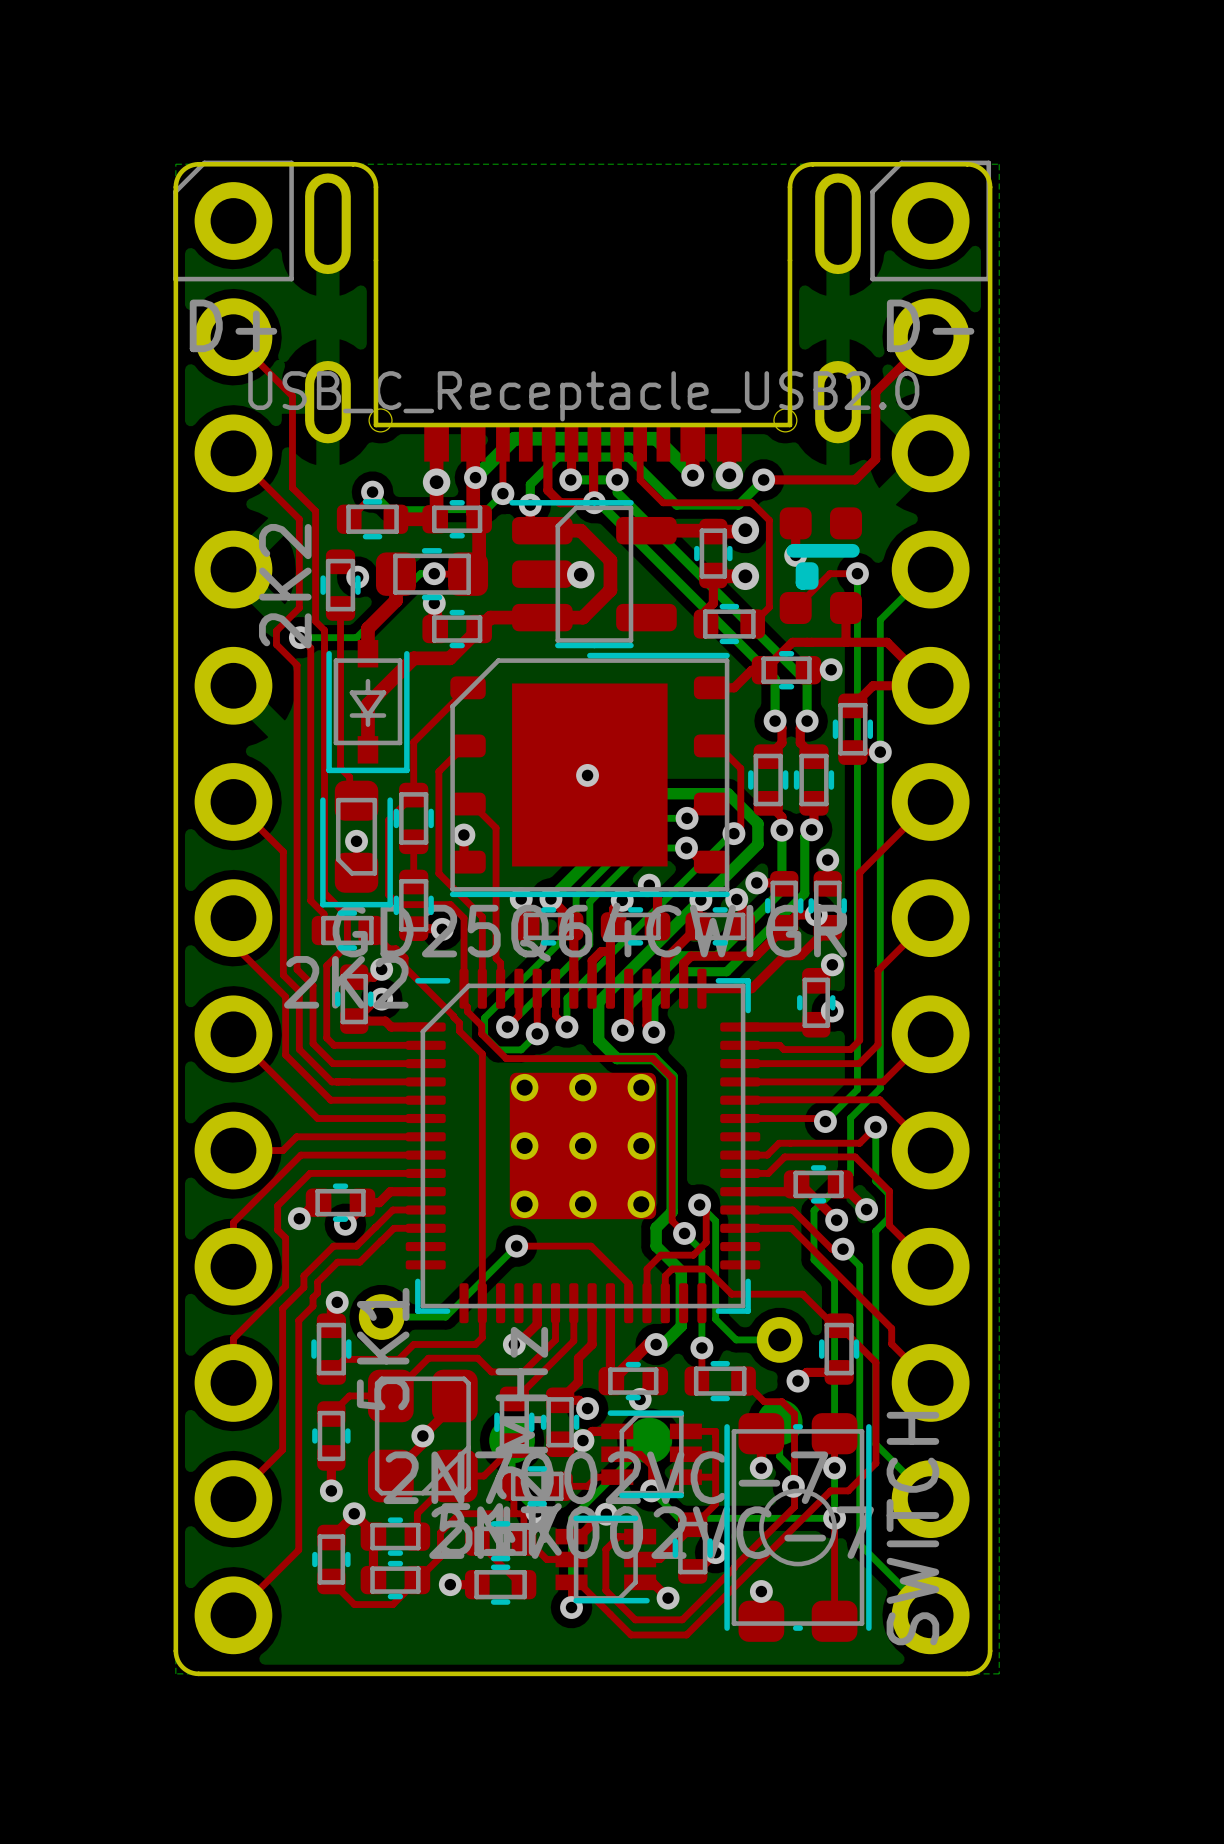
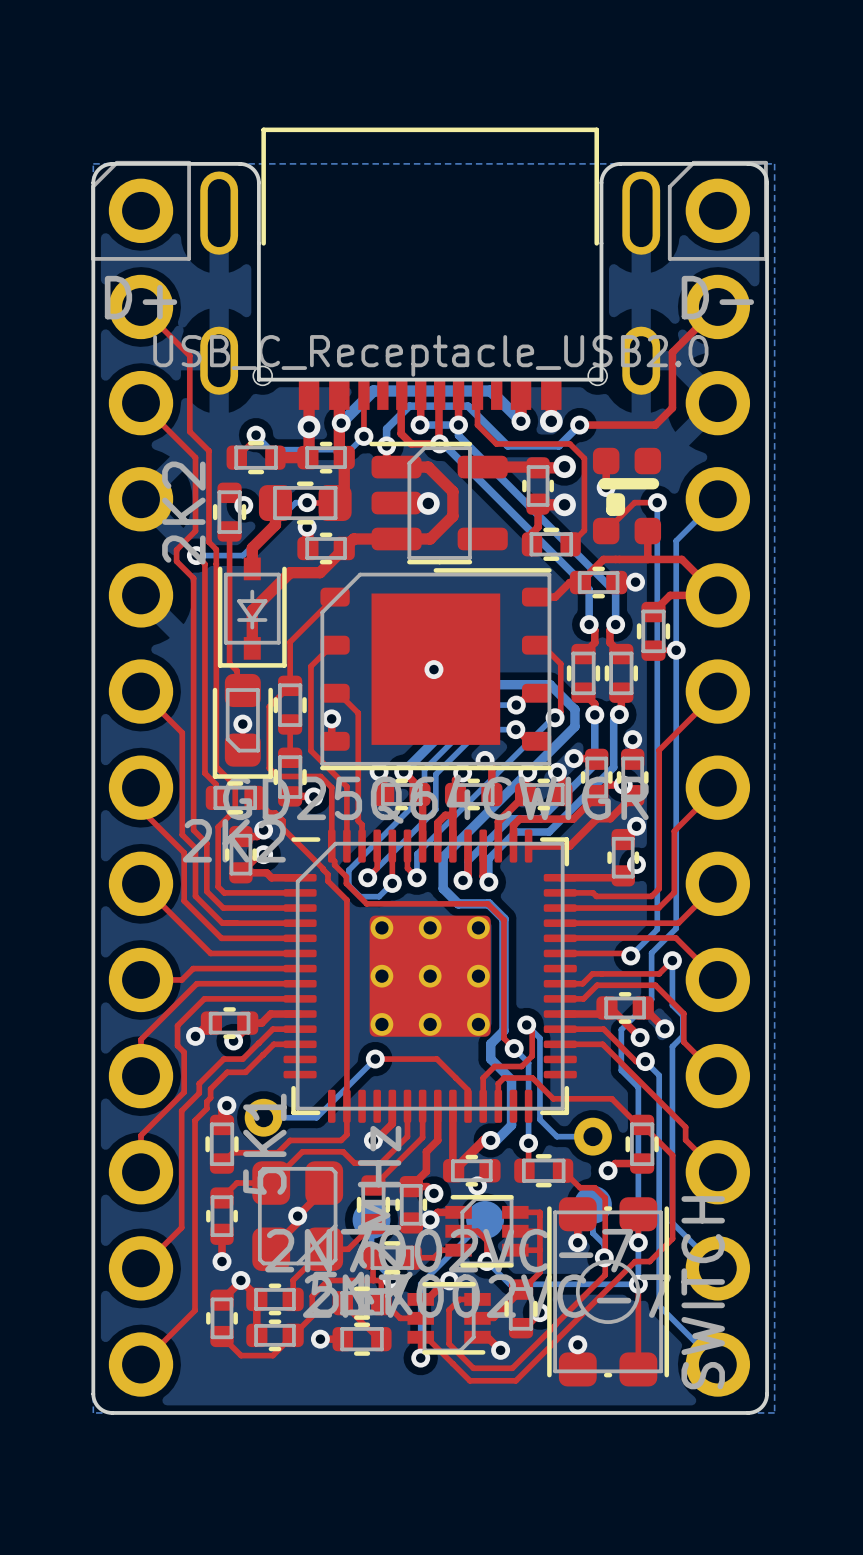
part footprint: [305, 173, 861, 462] -> [200, 127, 661, 410]

